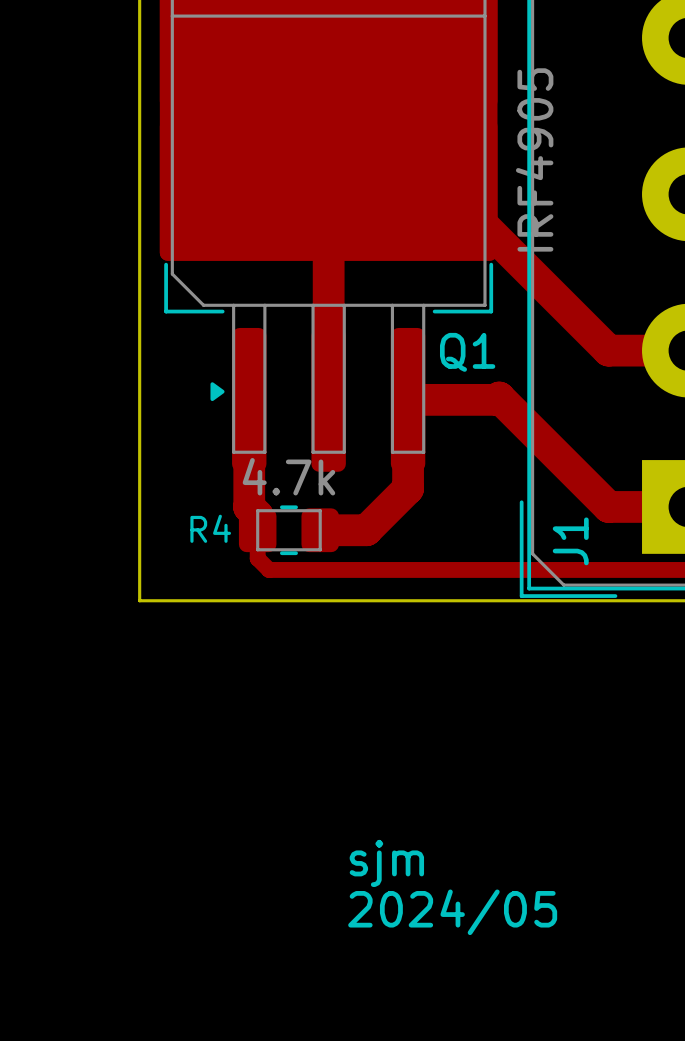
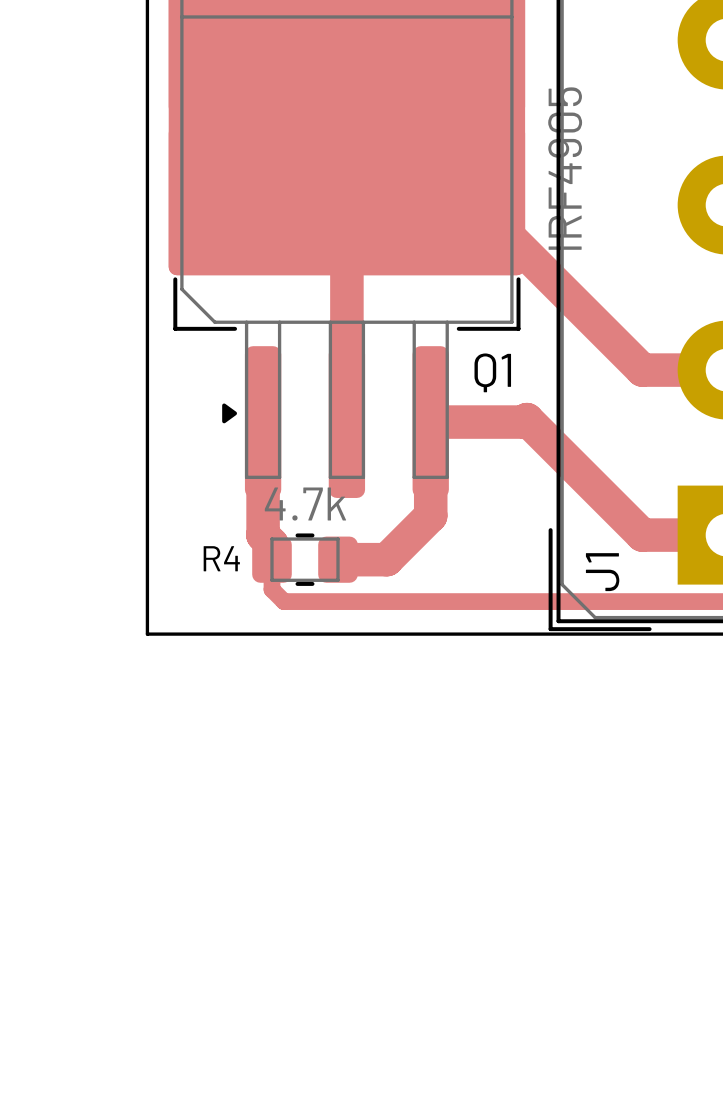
text: sjm (386, 863) -> none
text: 2024/05 (452, 912) -> none

